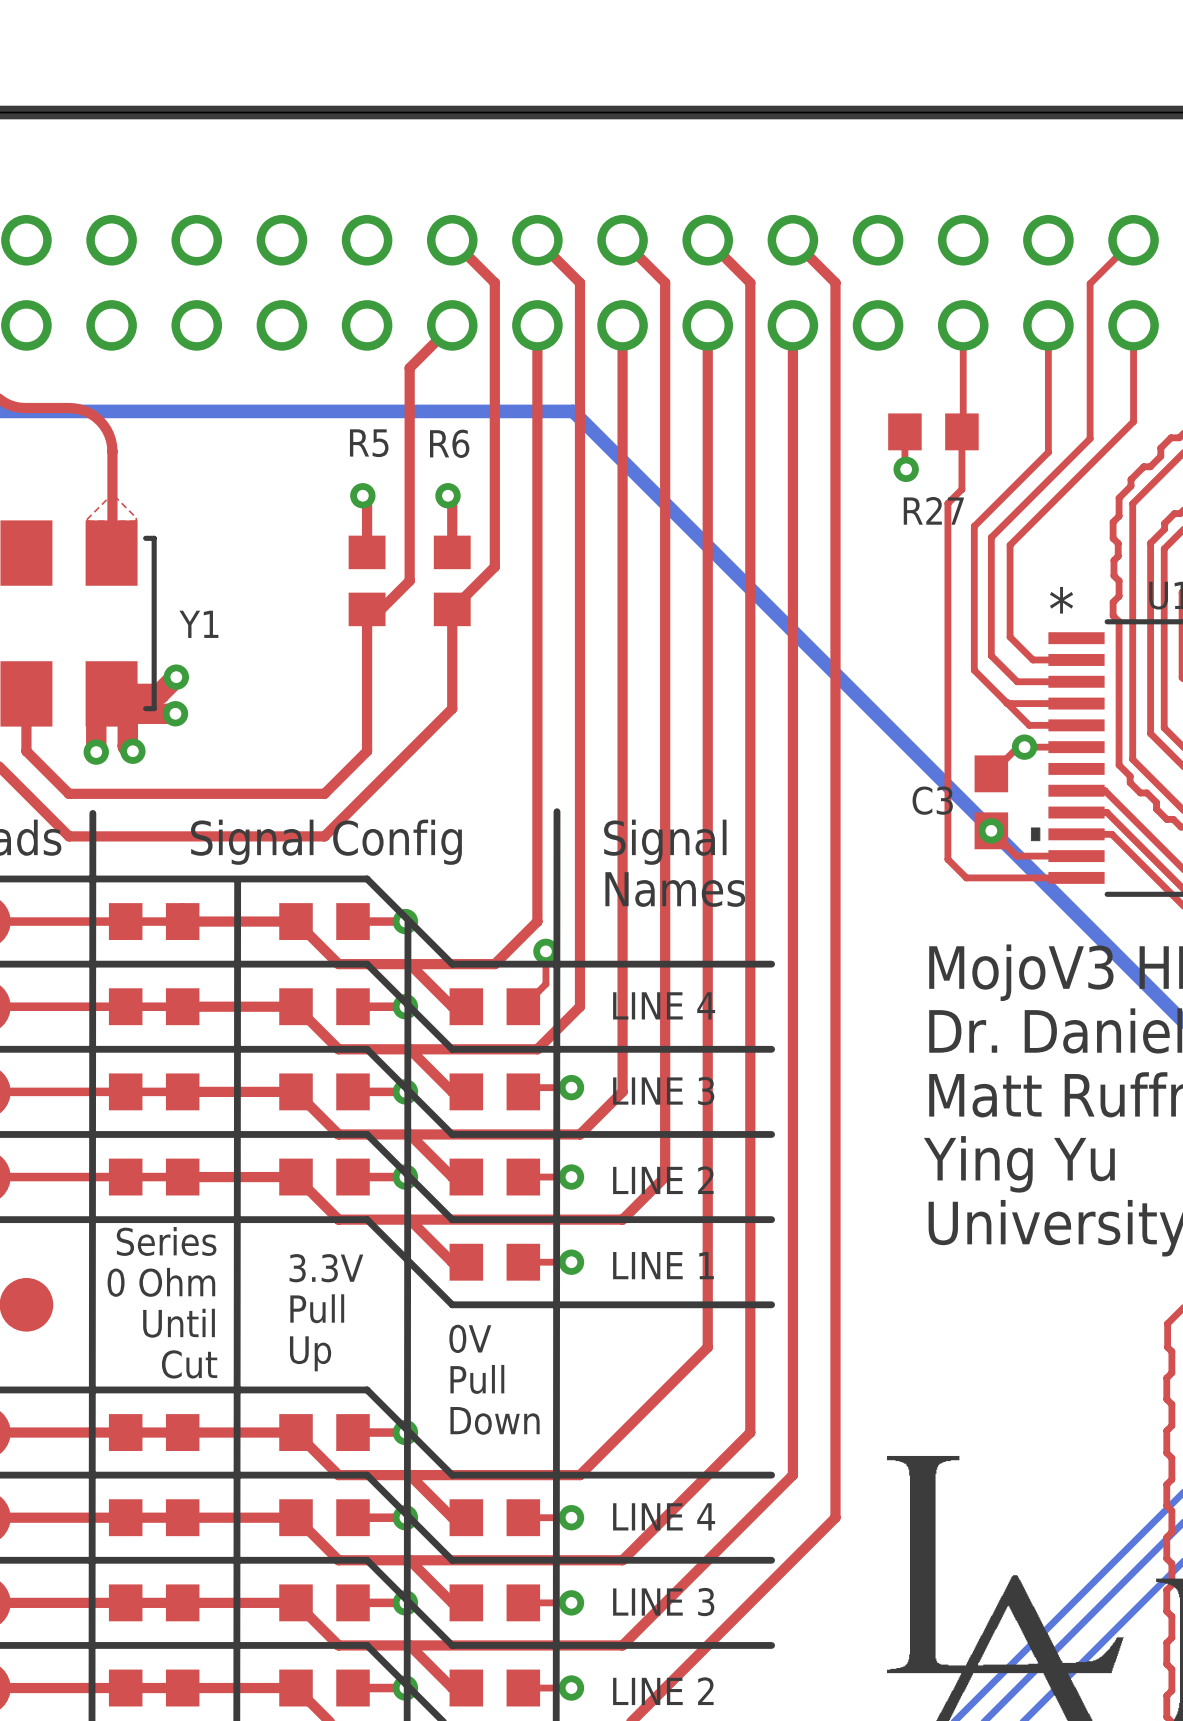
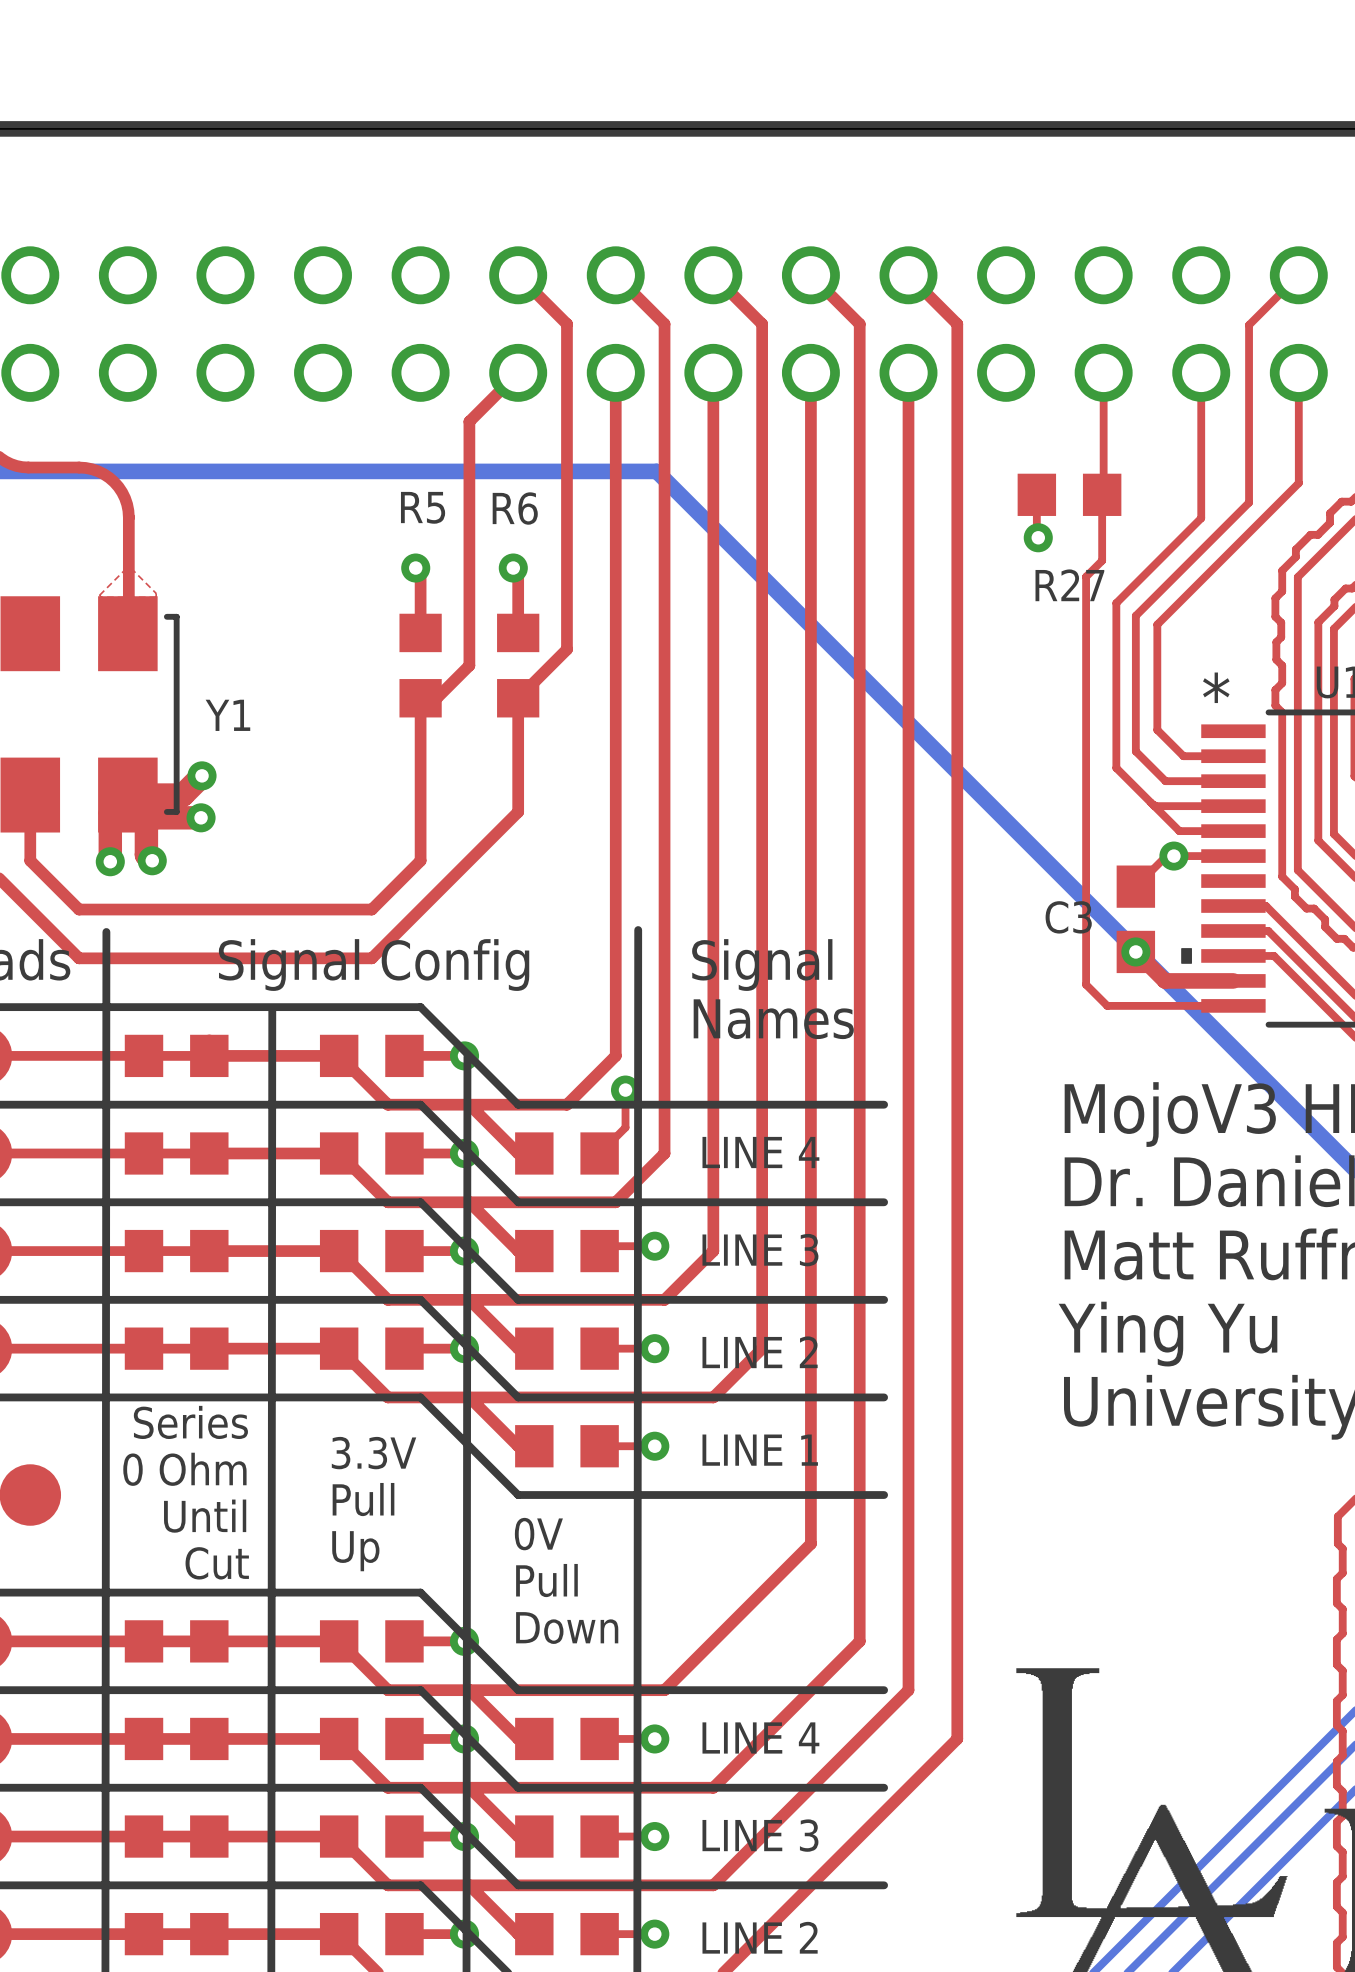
top track width: thin (991, 830) (1016, 856) (1076, 856) -> thick (1135, 951) (1164, 980) (1233, 980)

